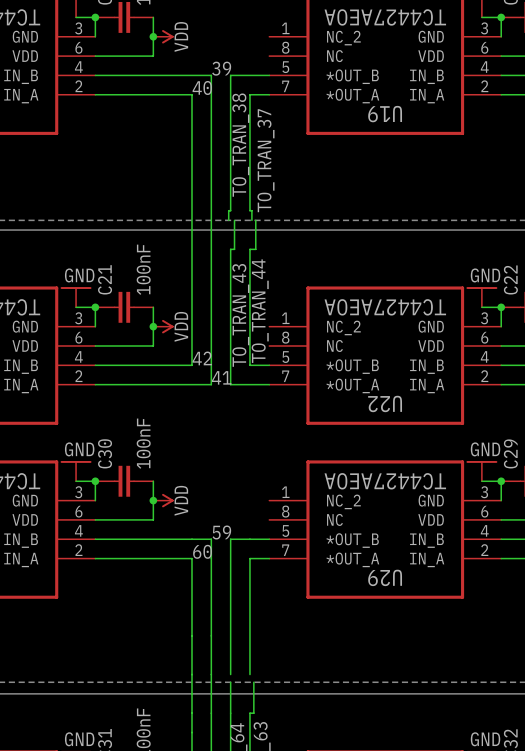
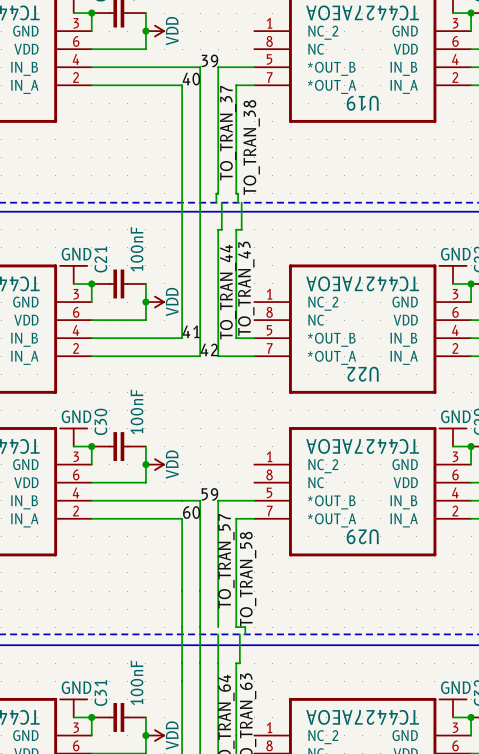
label: TO_TRAN_38 (240, 145) -> TO_TRAN_37 (228, 133)
label: TO_TRAN_37 (265, 160) -> TO_TRAN_38 (251, 147)
label: TO_TRAN_44 (260, 311) -> TO_TRAN_43 (246, 288)
label: TO_TRAN_43 (240, 315) -> TO_TRAN_44 (228, 292)
label: 42 (202, 358) -> 41 (191, 331)
label: 41 (221, 377) -> 42 (209, 349)
label: none -> TO_TRAN_57 (226, 561)
label: none -> TO_TRAN_58 (248, 579)
wire: none -> (236, 627) (245, 627) (245, 634)

